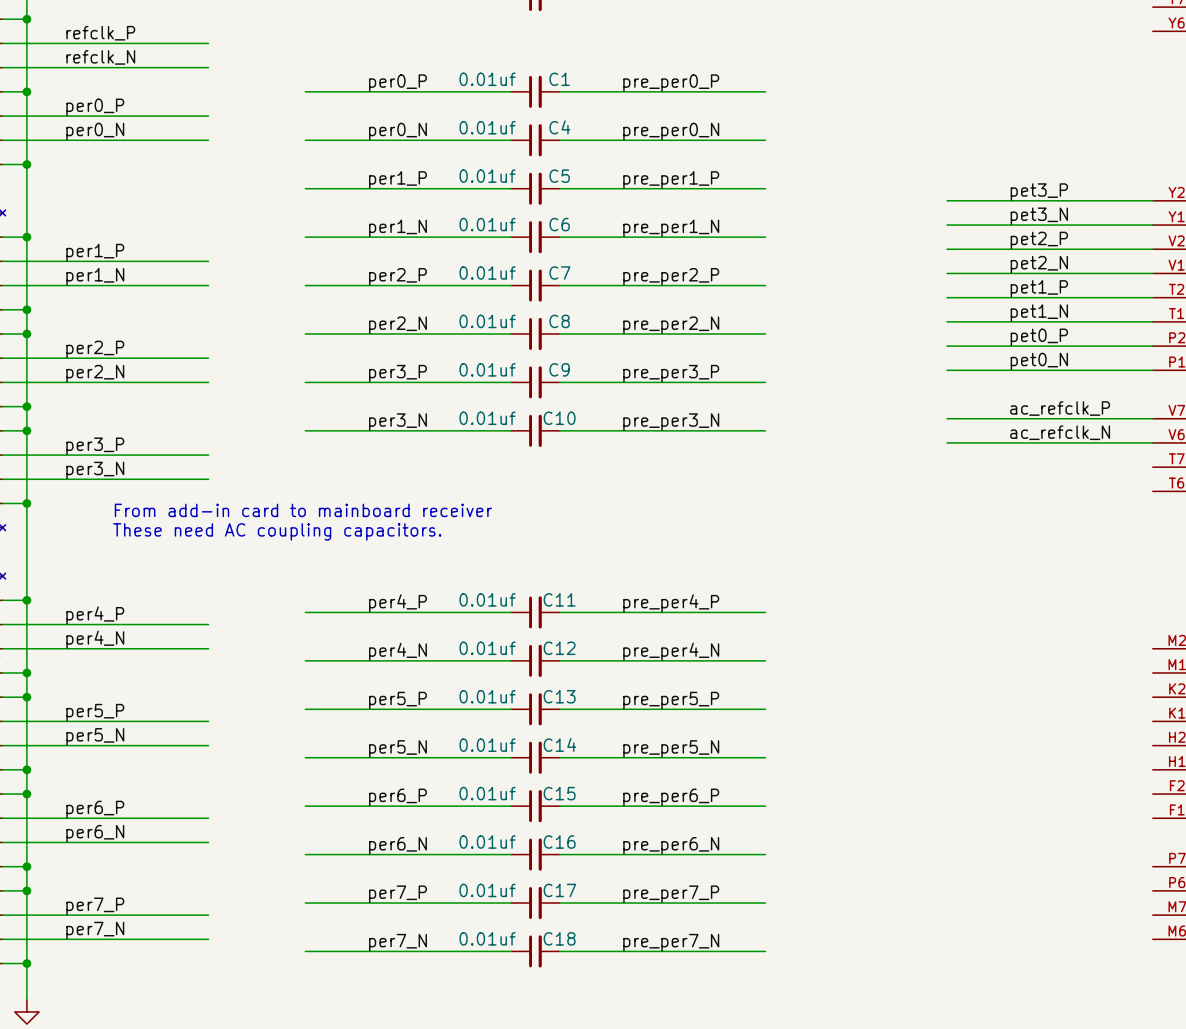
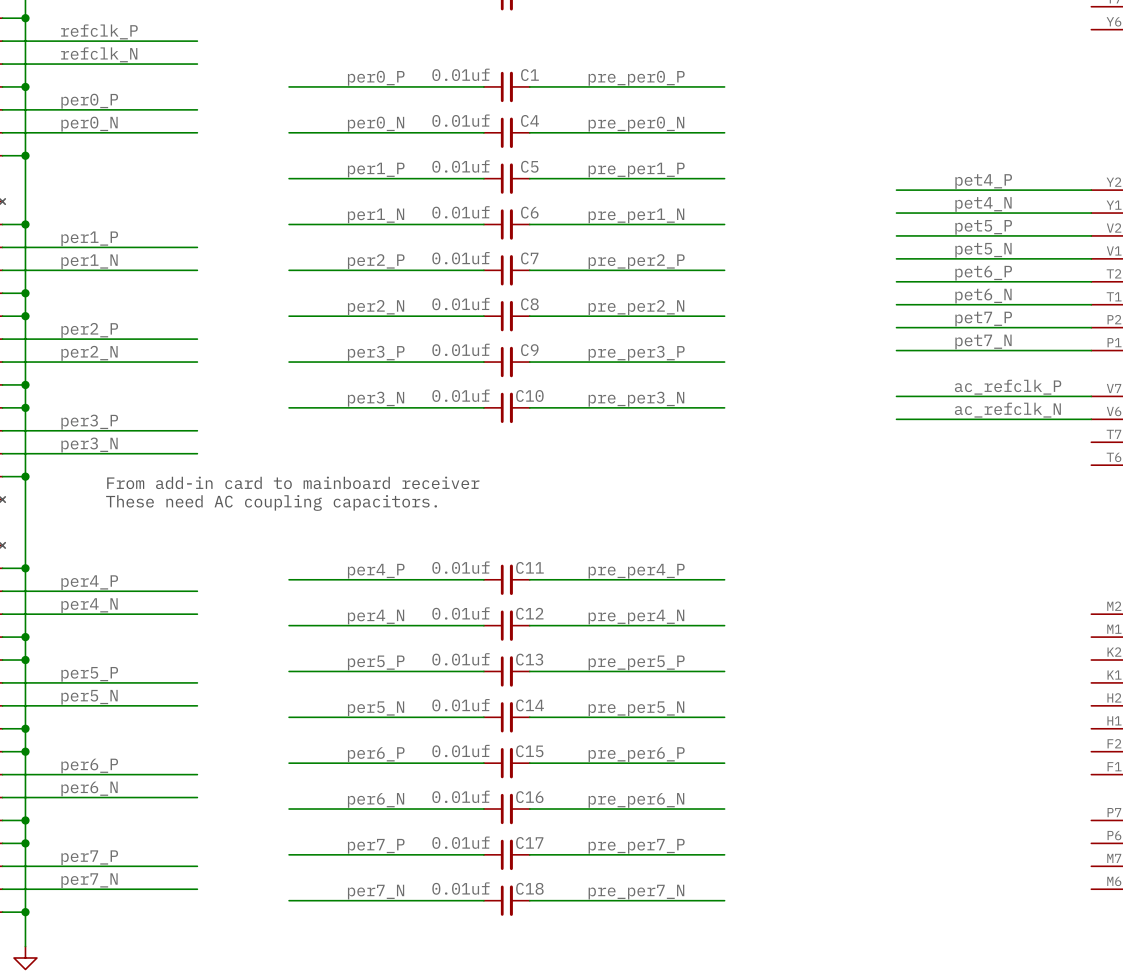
label: pet3_P (1039, 192) -> pet4_P (983, 181)
label: pet3_N (1039, 216) -> pet4_N (983, 204)
label: pet2_P (1039, 240) -> pet5_P (983, 227)
label: pet2_N (1039, 264) -> pet5_N (983, 250)
label: pet1_P (1039, 288) -> pet6_P (983, 273)
label: pet1_N (1039, 313) -> pet6_N (983, 296)
label: pet0_P (1039, 337) -> pet7_P (983, 319)
label: pet0_N (1039, 361) -> pet7_N (983, 341)

